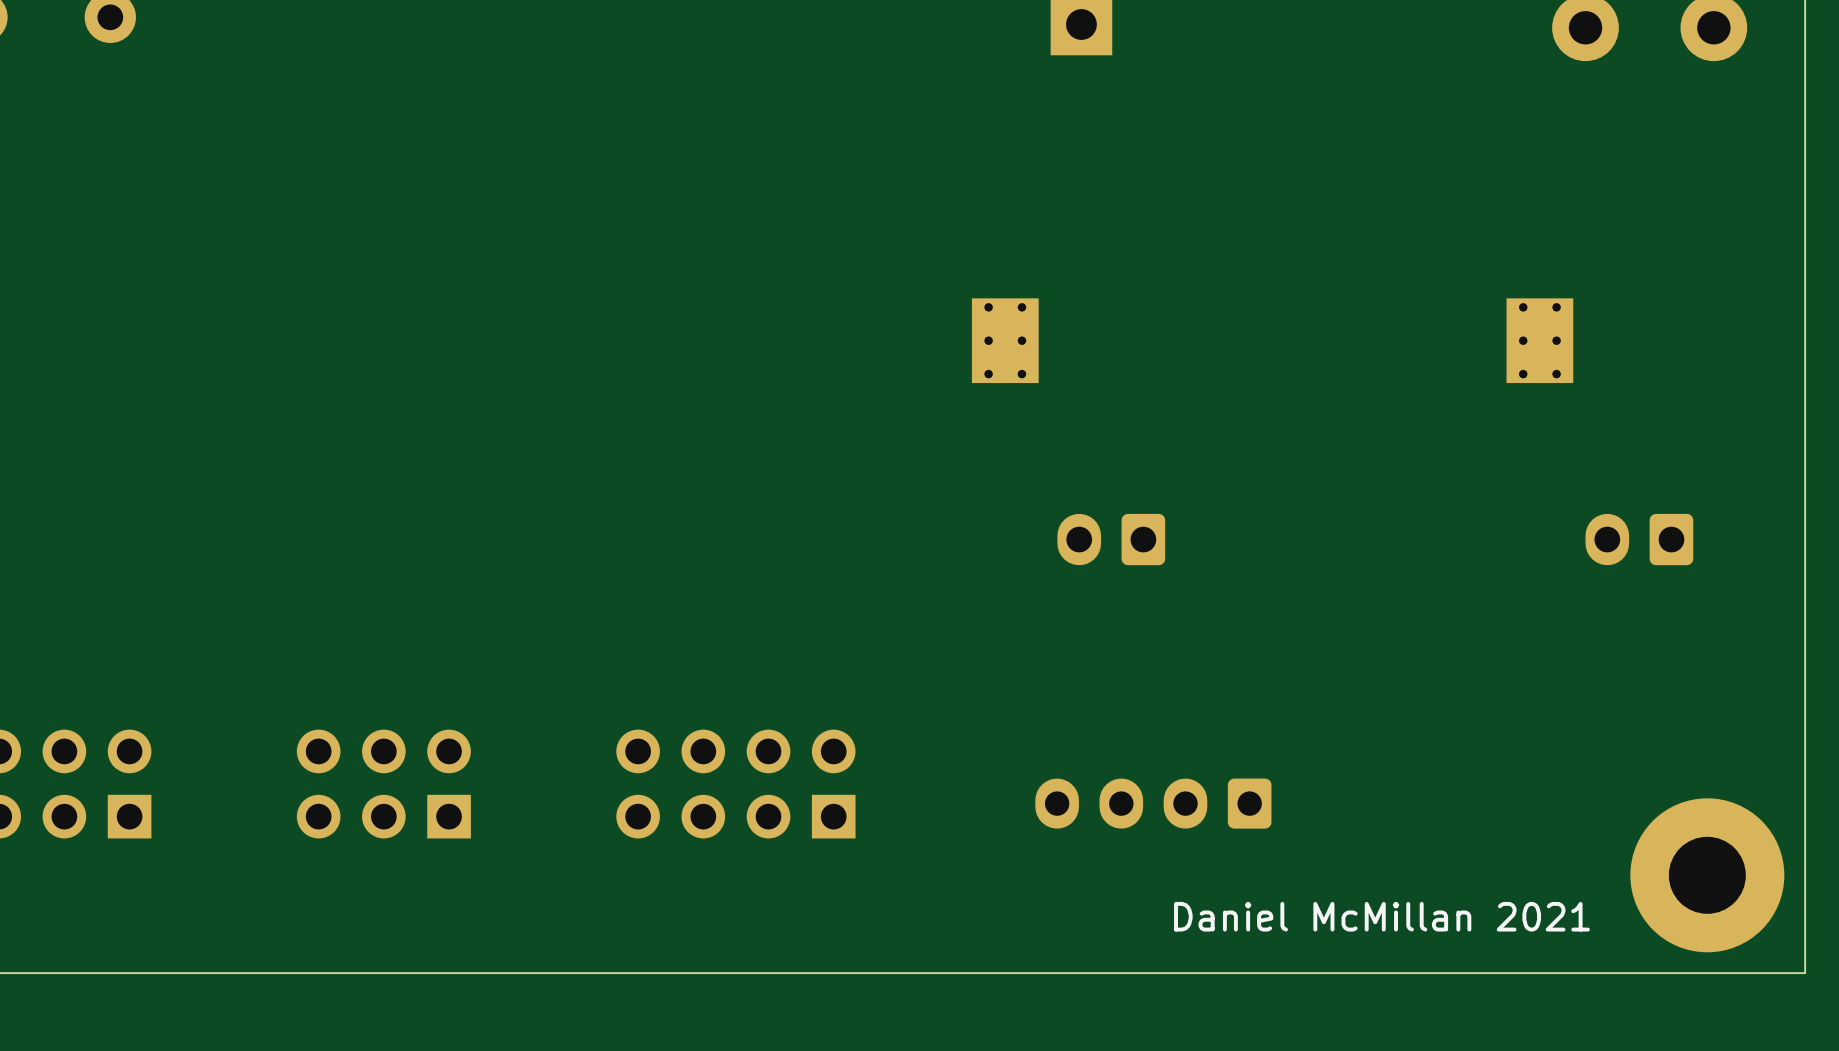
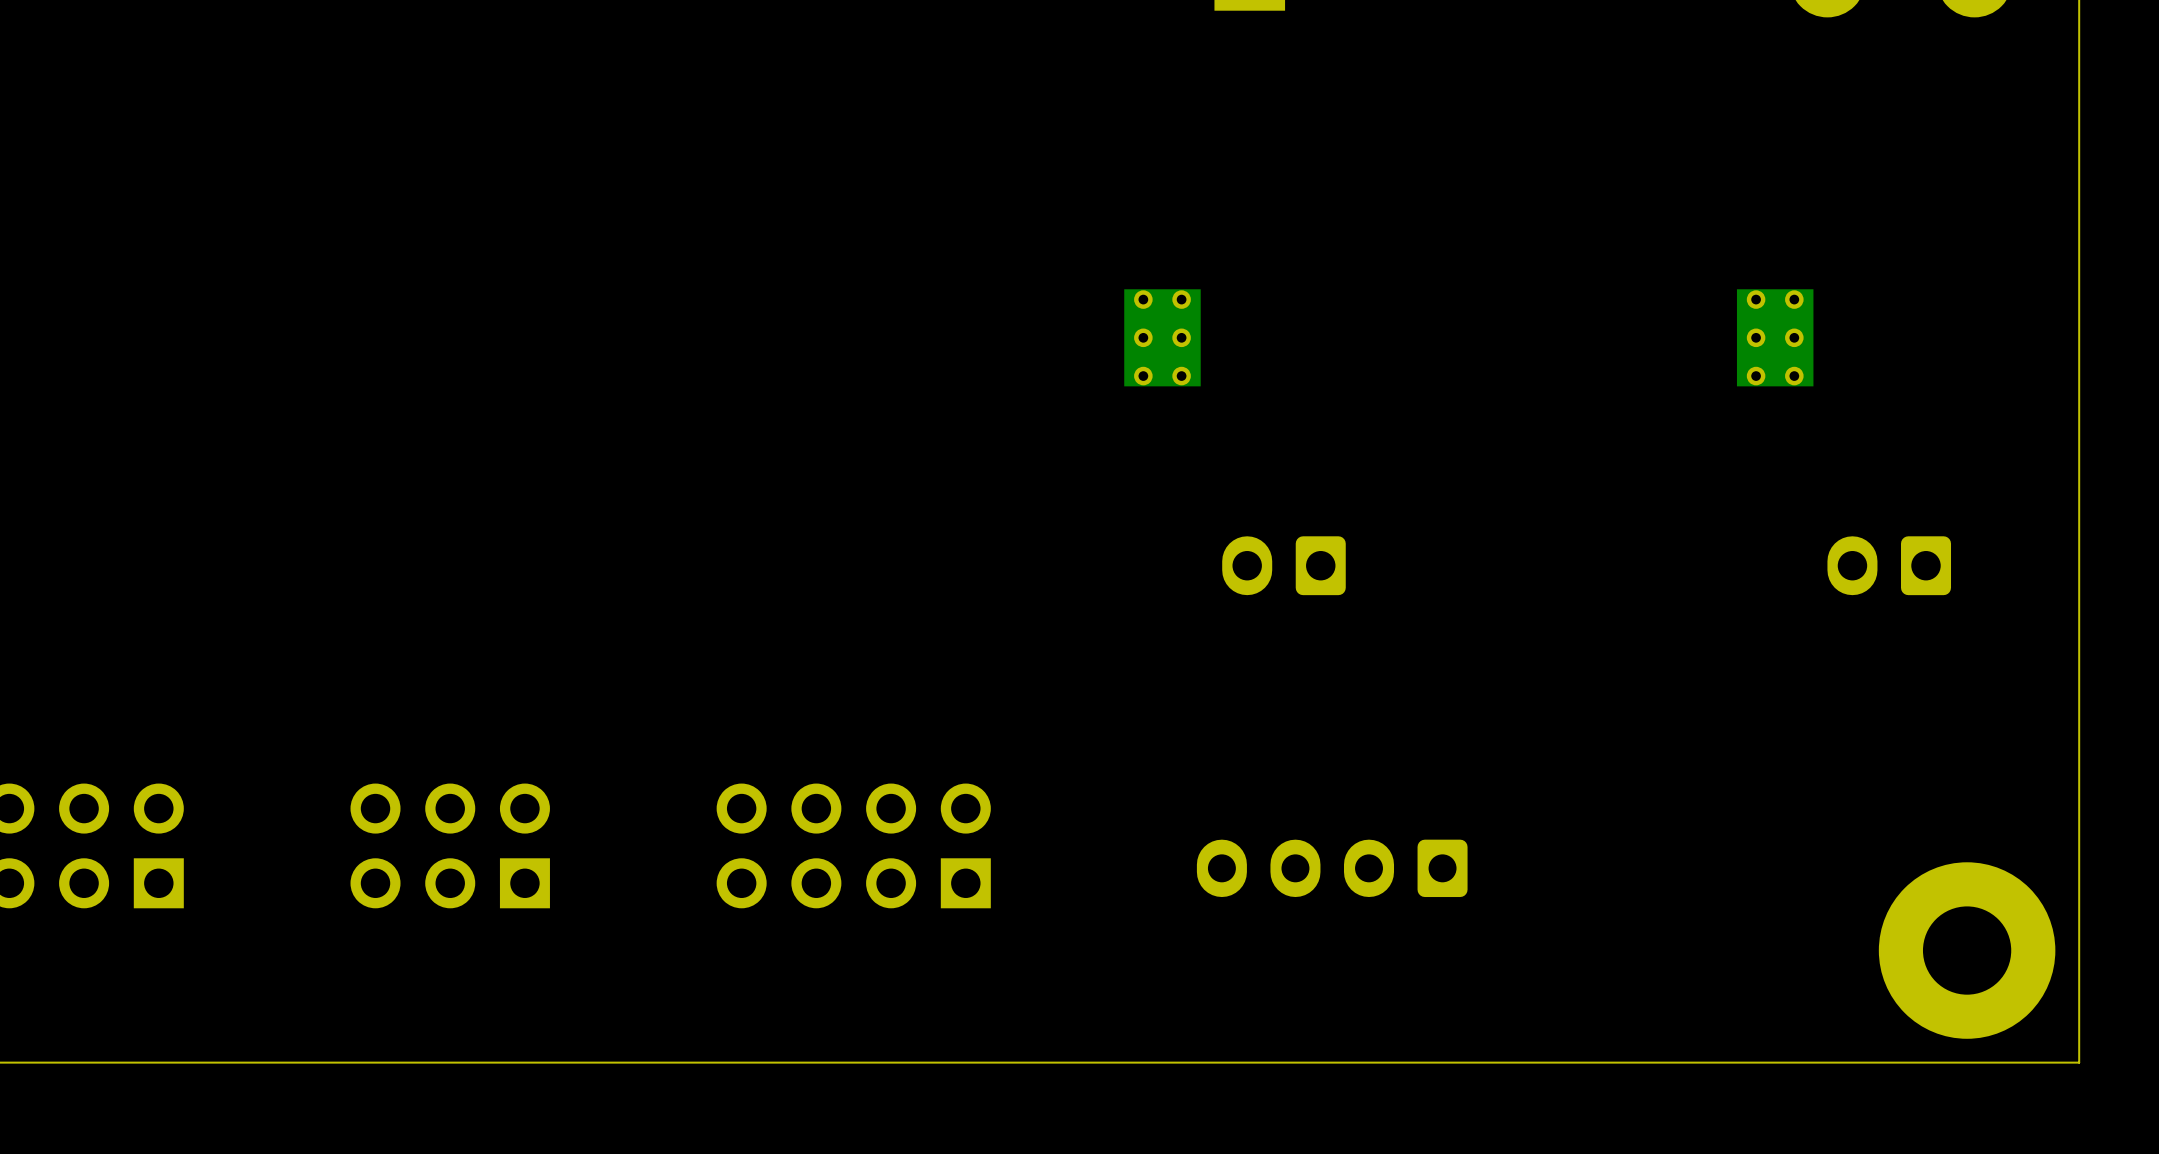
text: Daniel McMillan 2021 (1381, 916) -> none

